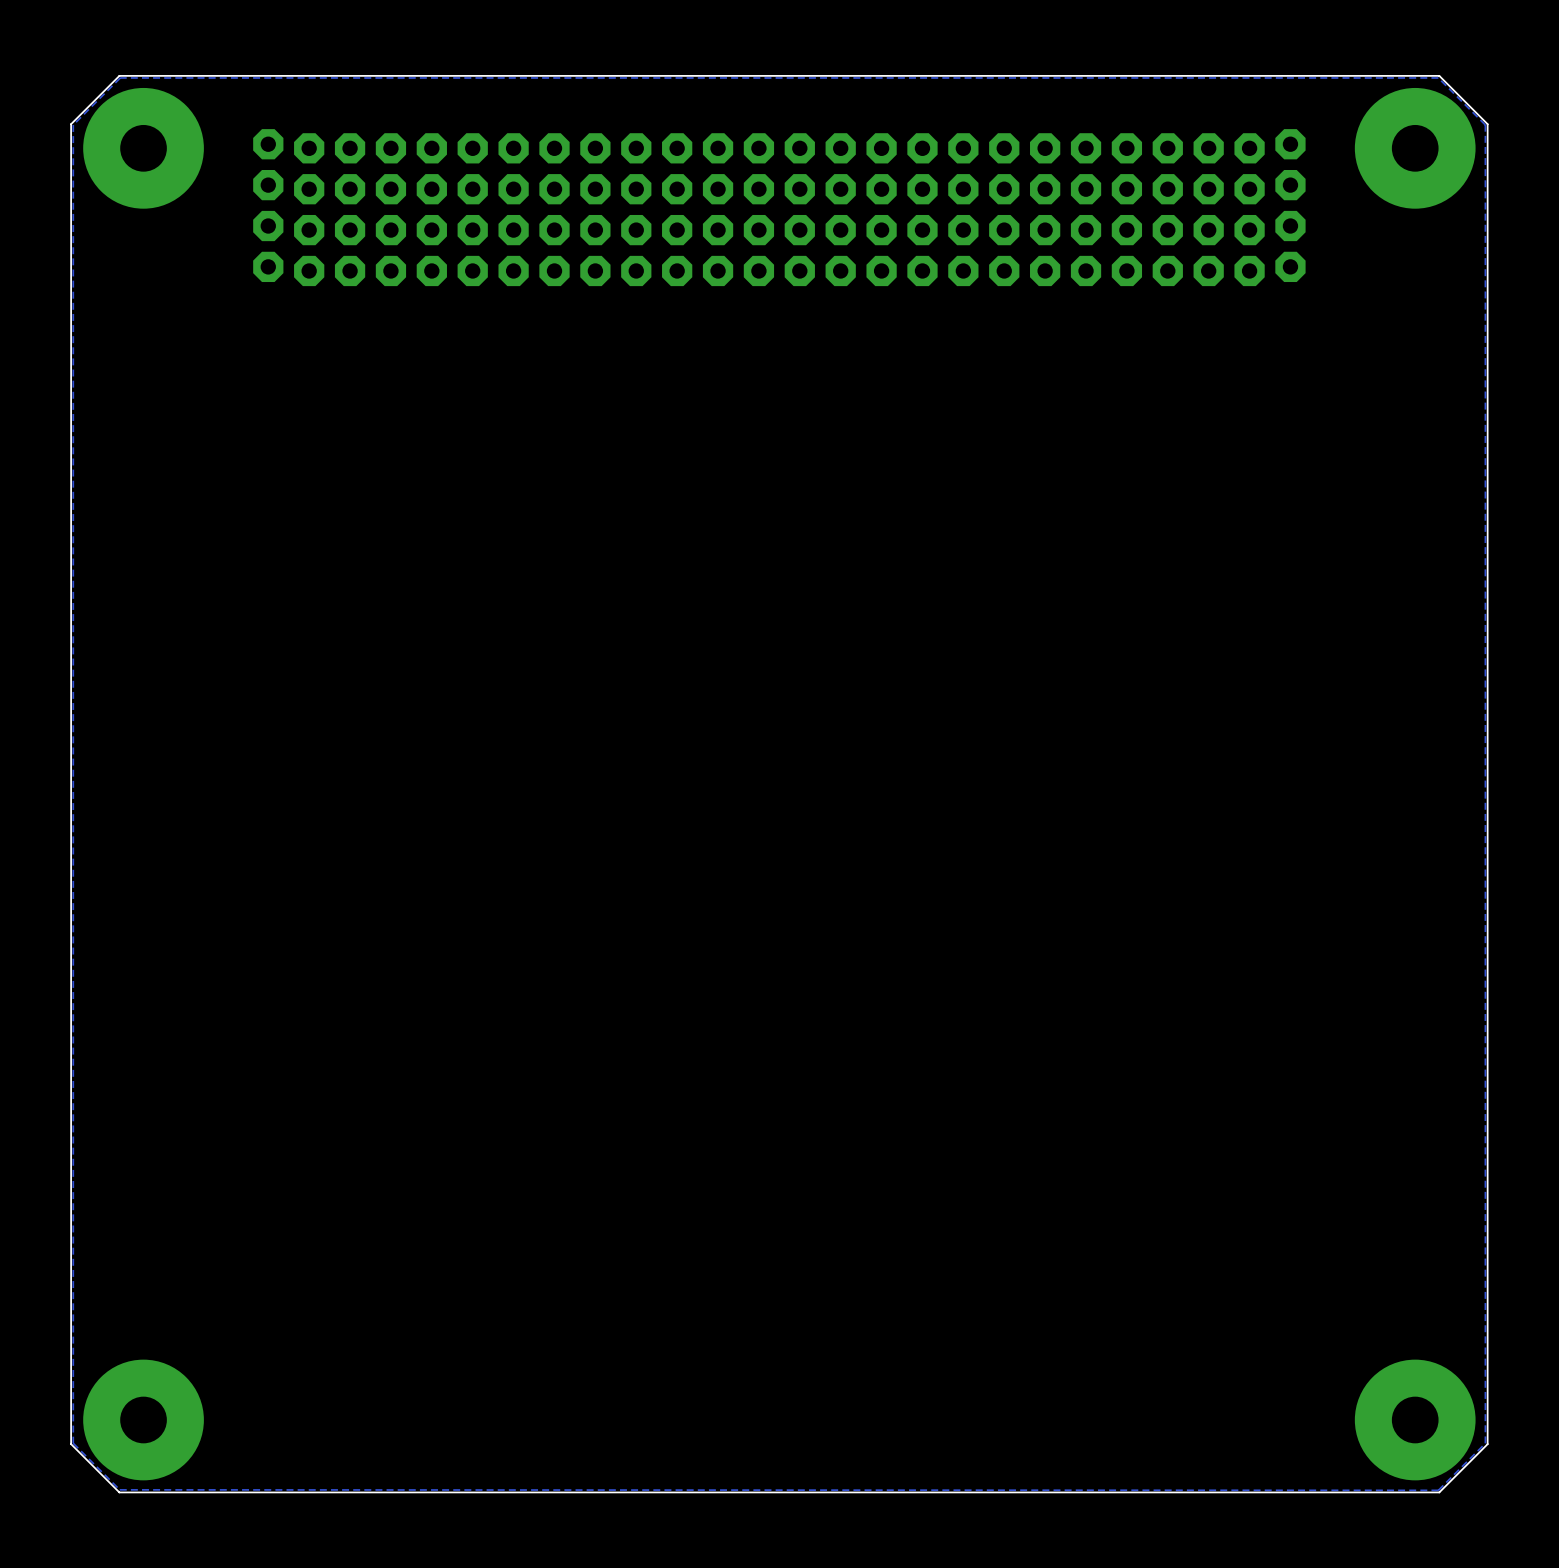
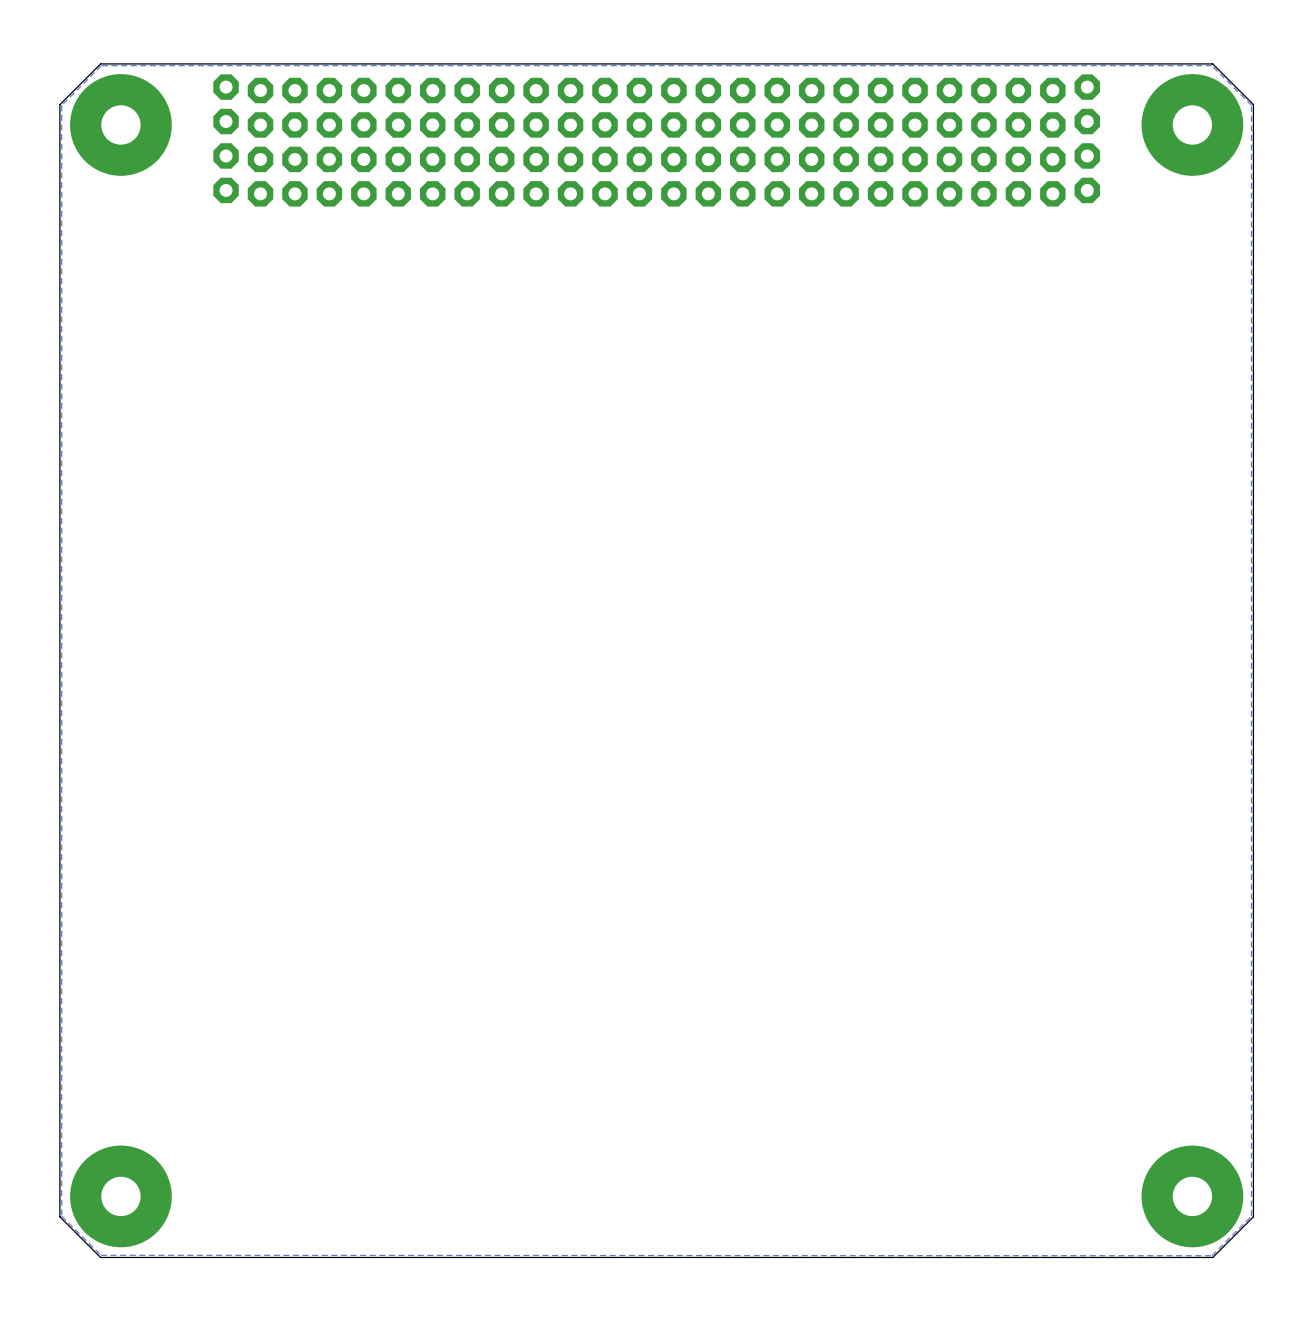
part position: (779, 207) -> (656, 140)

